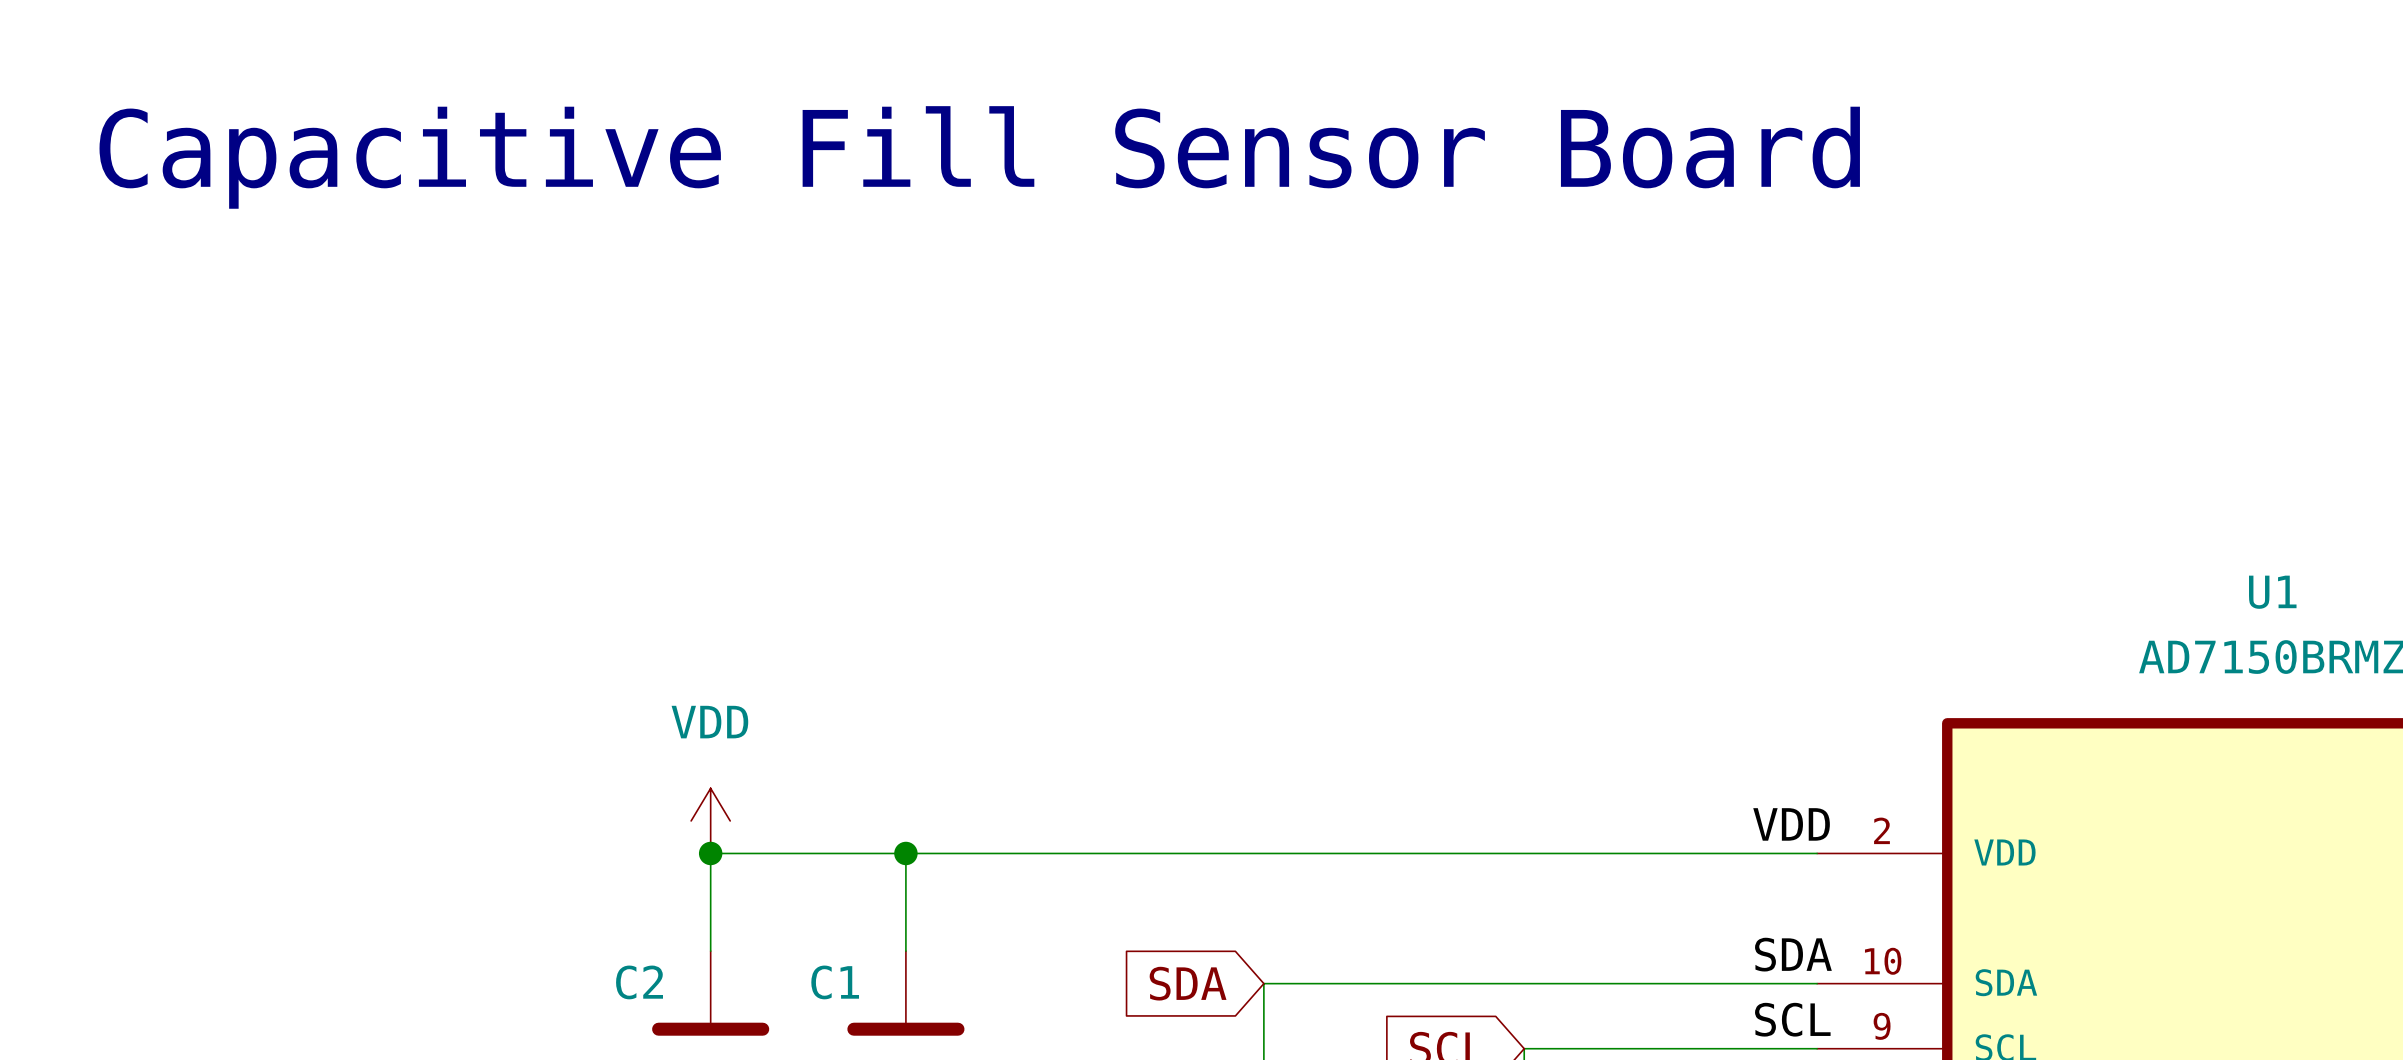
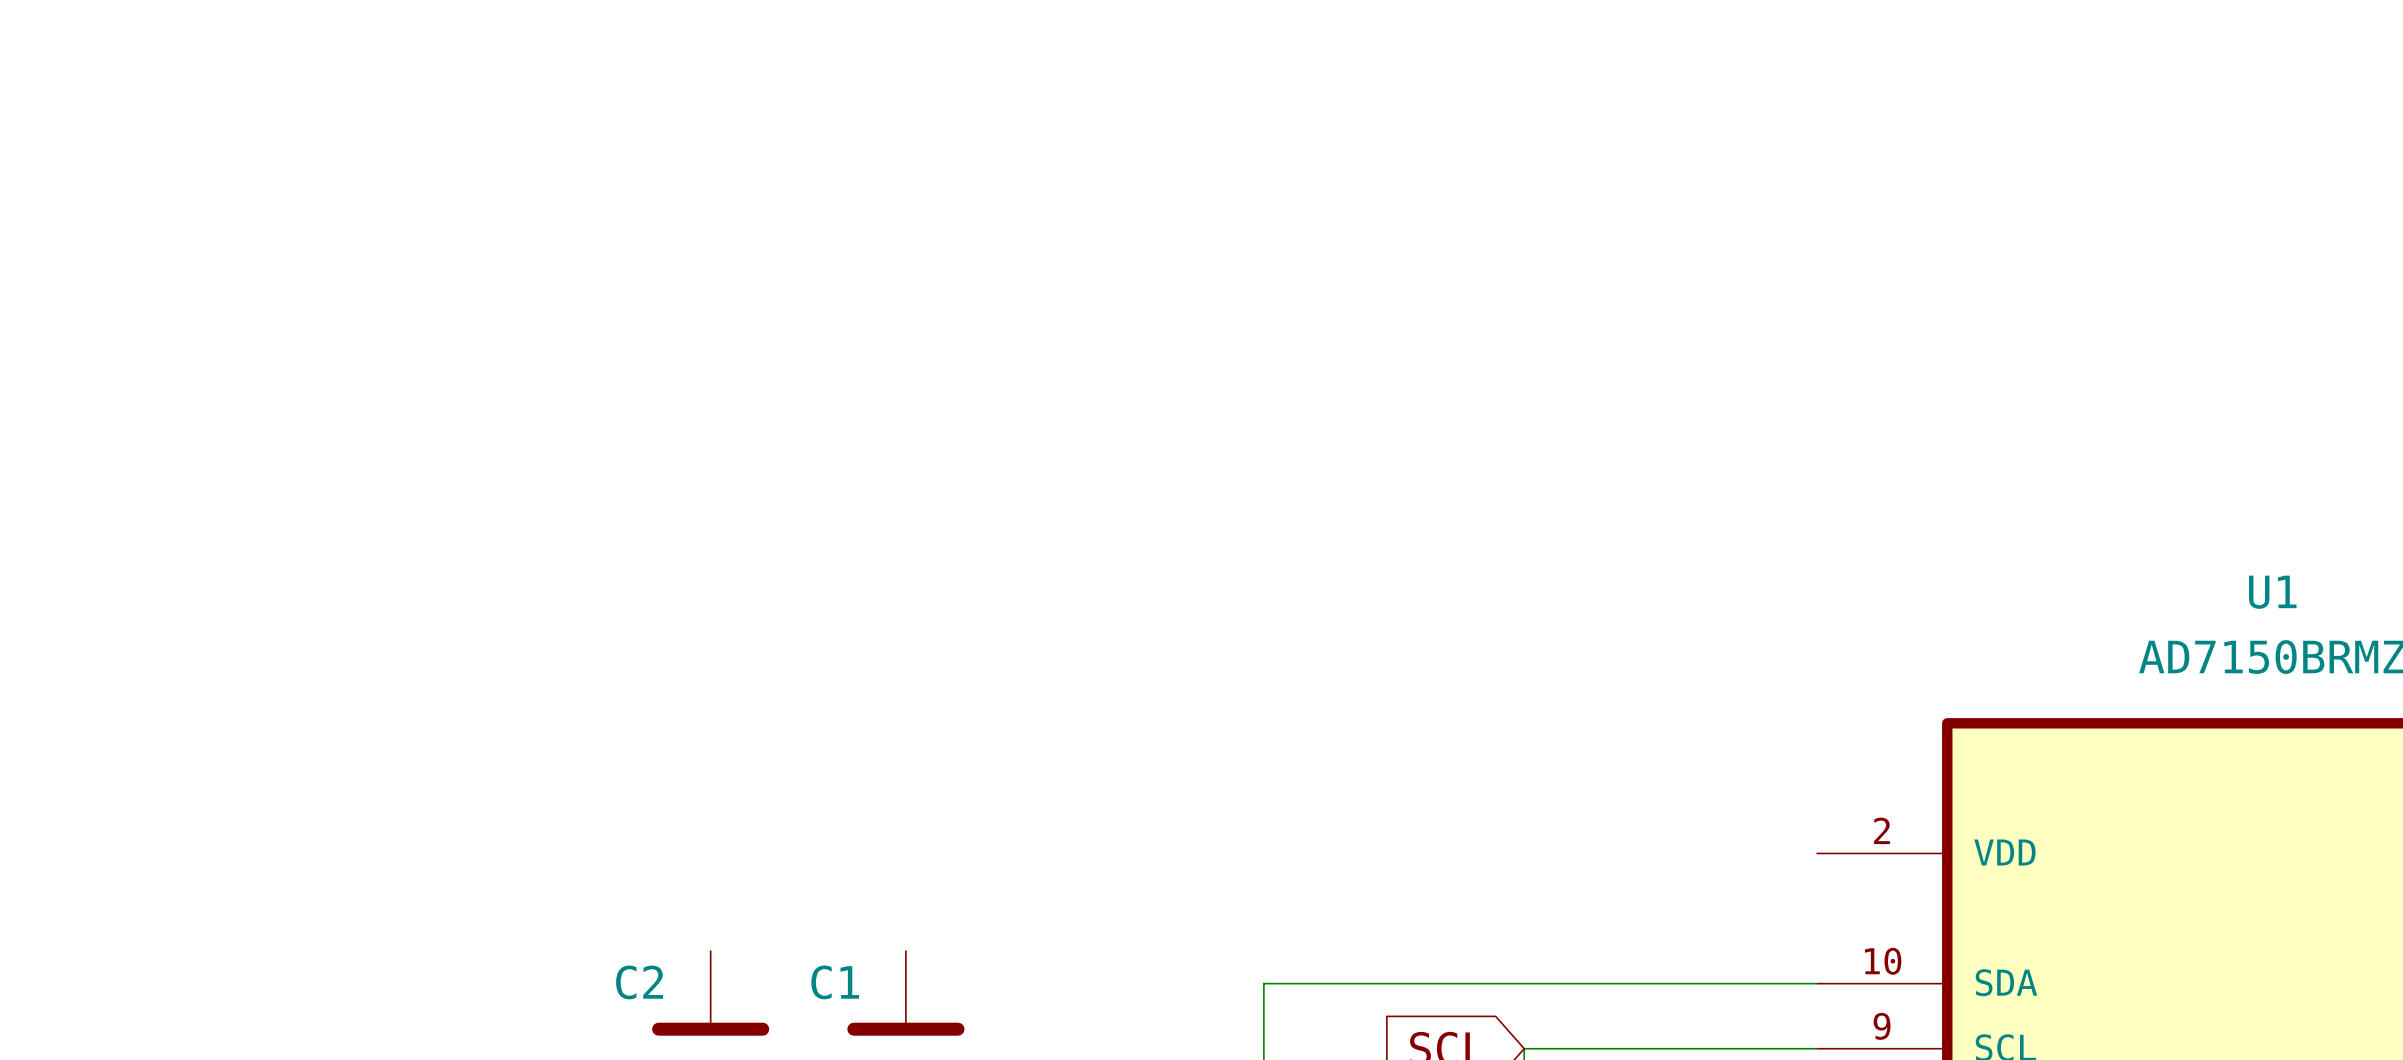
text: Capacitive Fill Sensor Board (979, 157) -> none
power symbol: VDD (710, 820) -> none
label: VDD (1791, 824) -> none
junction: (710, 853) -> none
wire: (905, 853) (905, 951) -> none
junction: (905, 853) -> none
wire: (1817, 853) (710, 853) (710, 951) -> none
label: SDA (1793, 954) -> none
global label: SDA (1188, 983) -> none
label: SCL (1792, 1019) -> none

